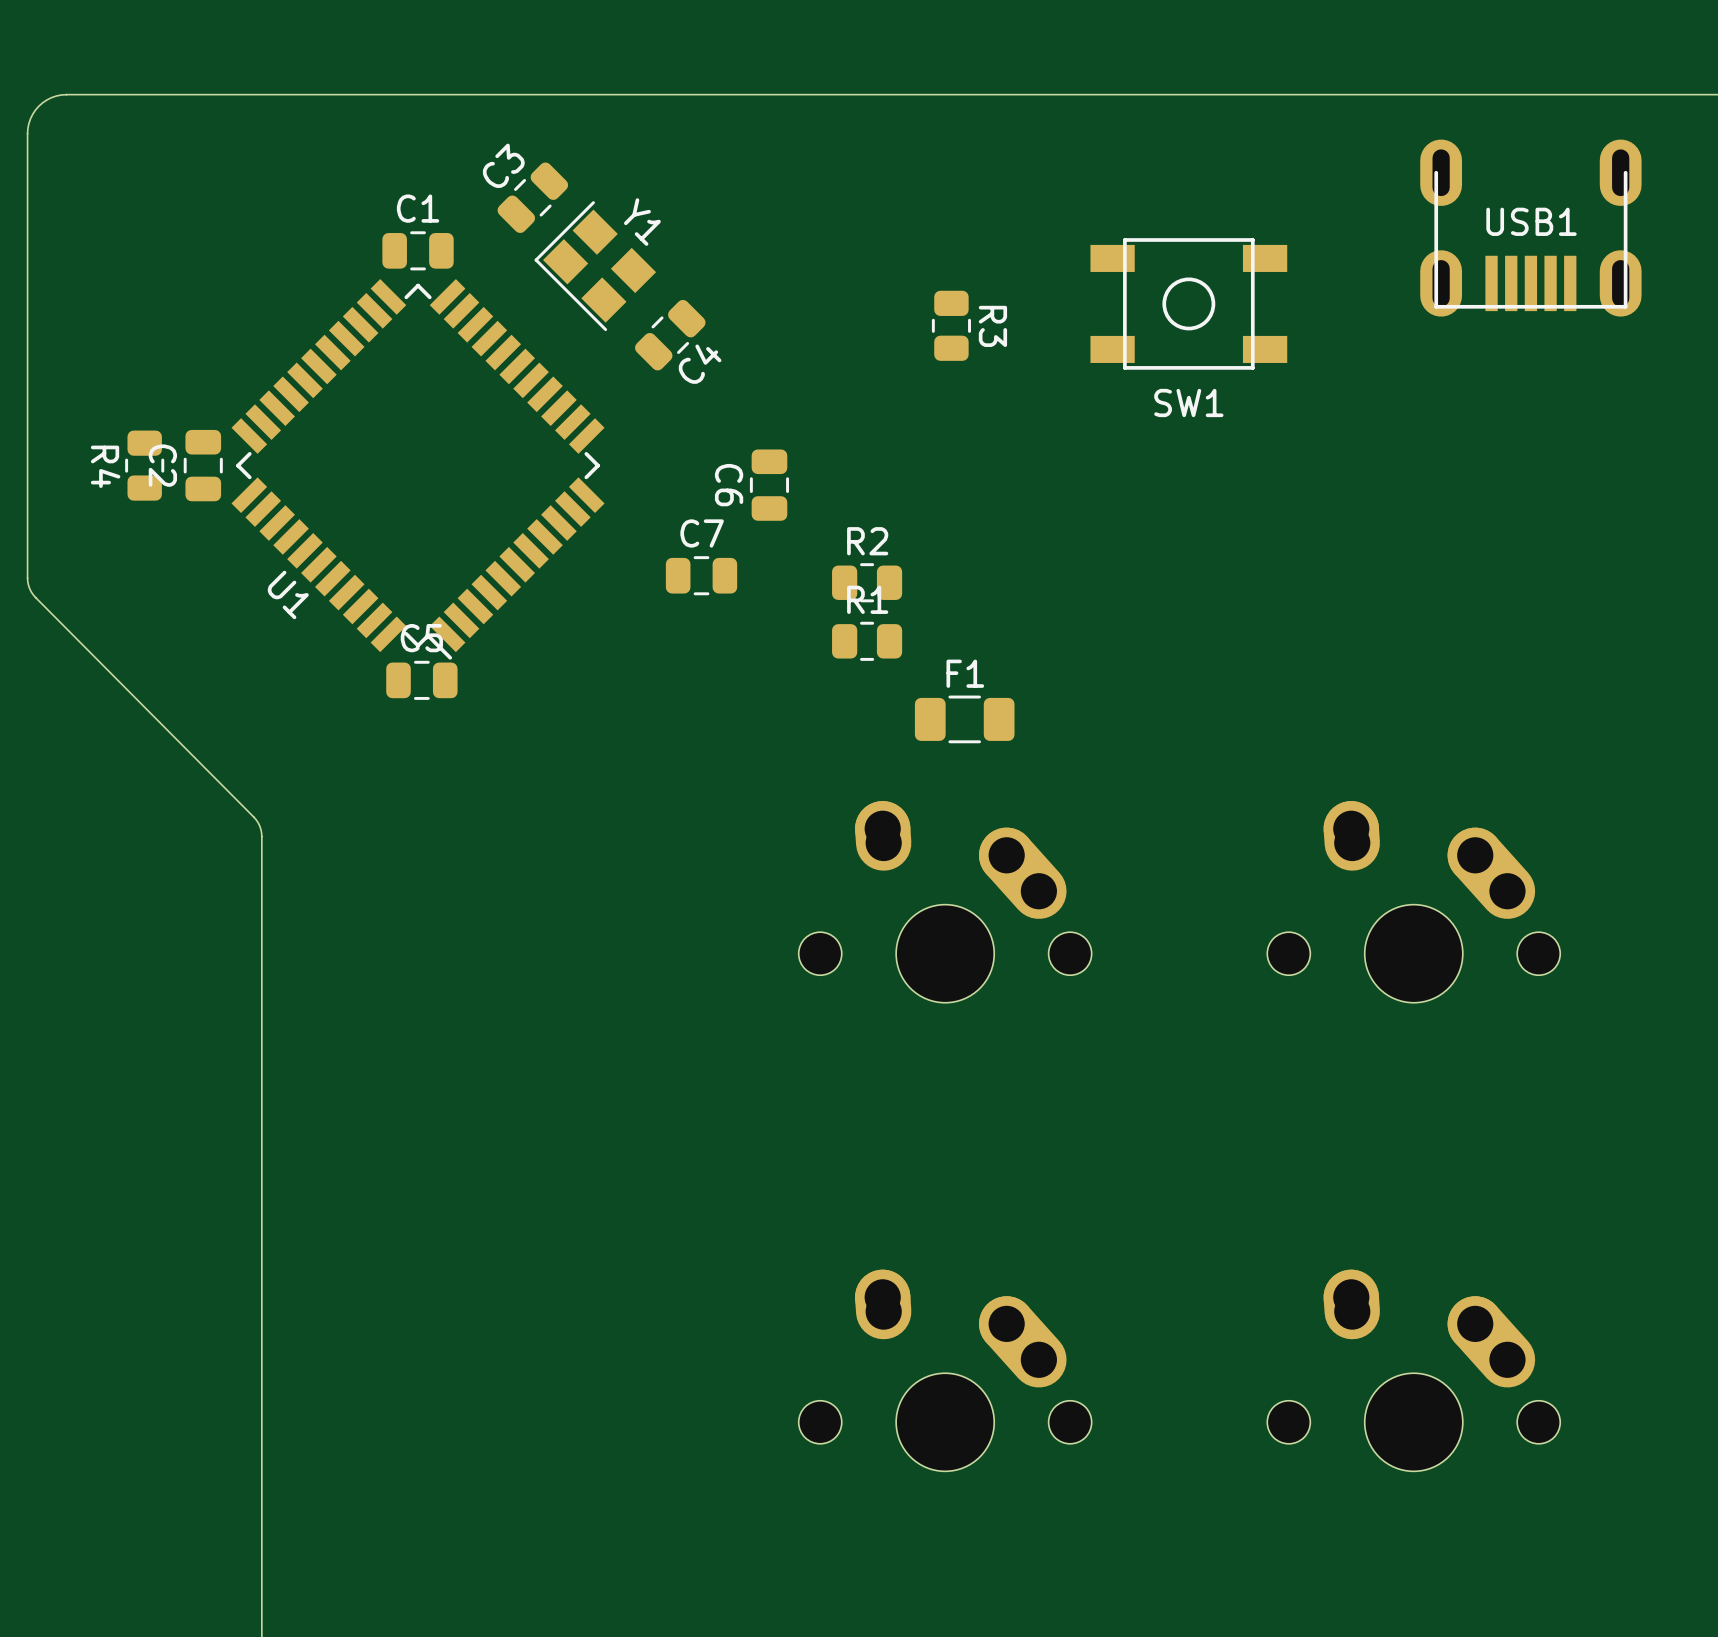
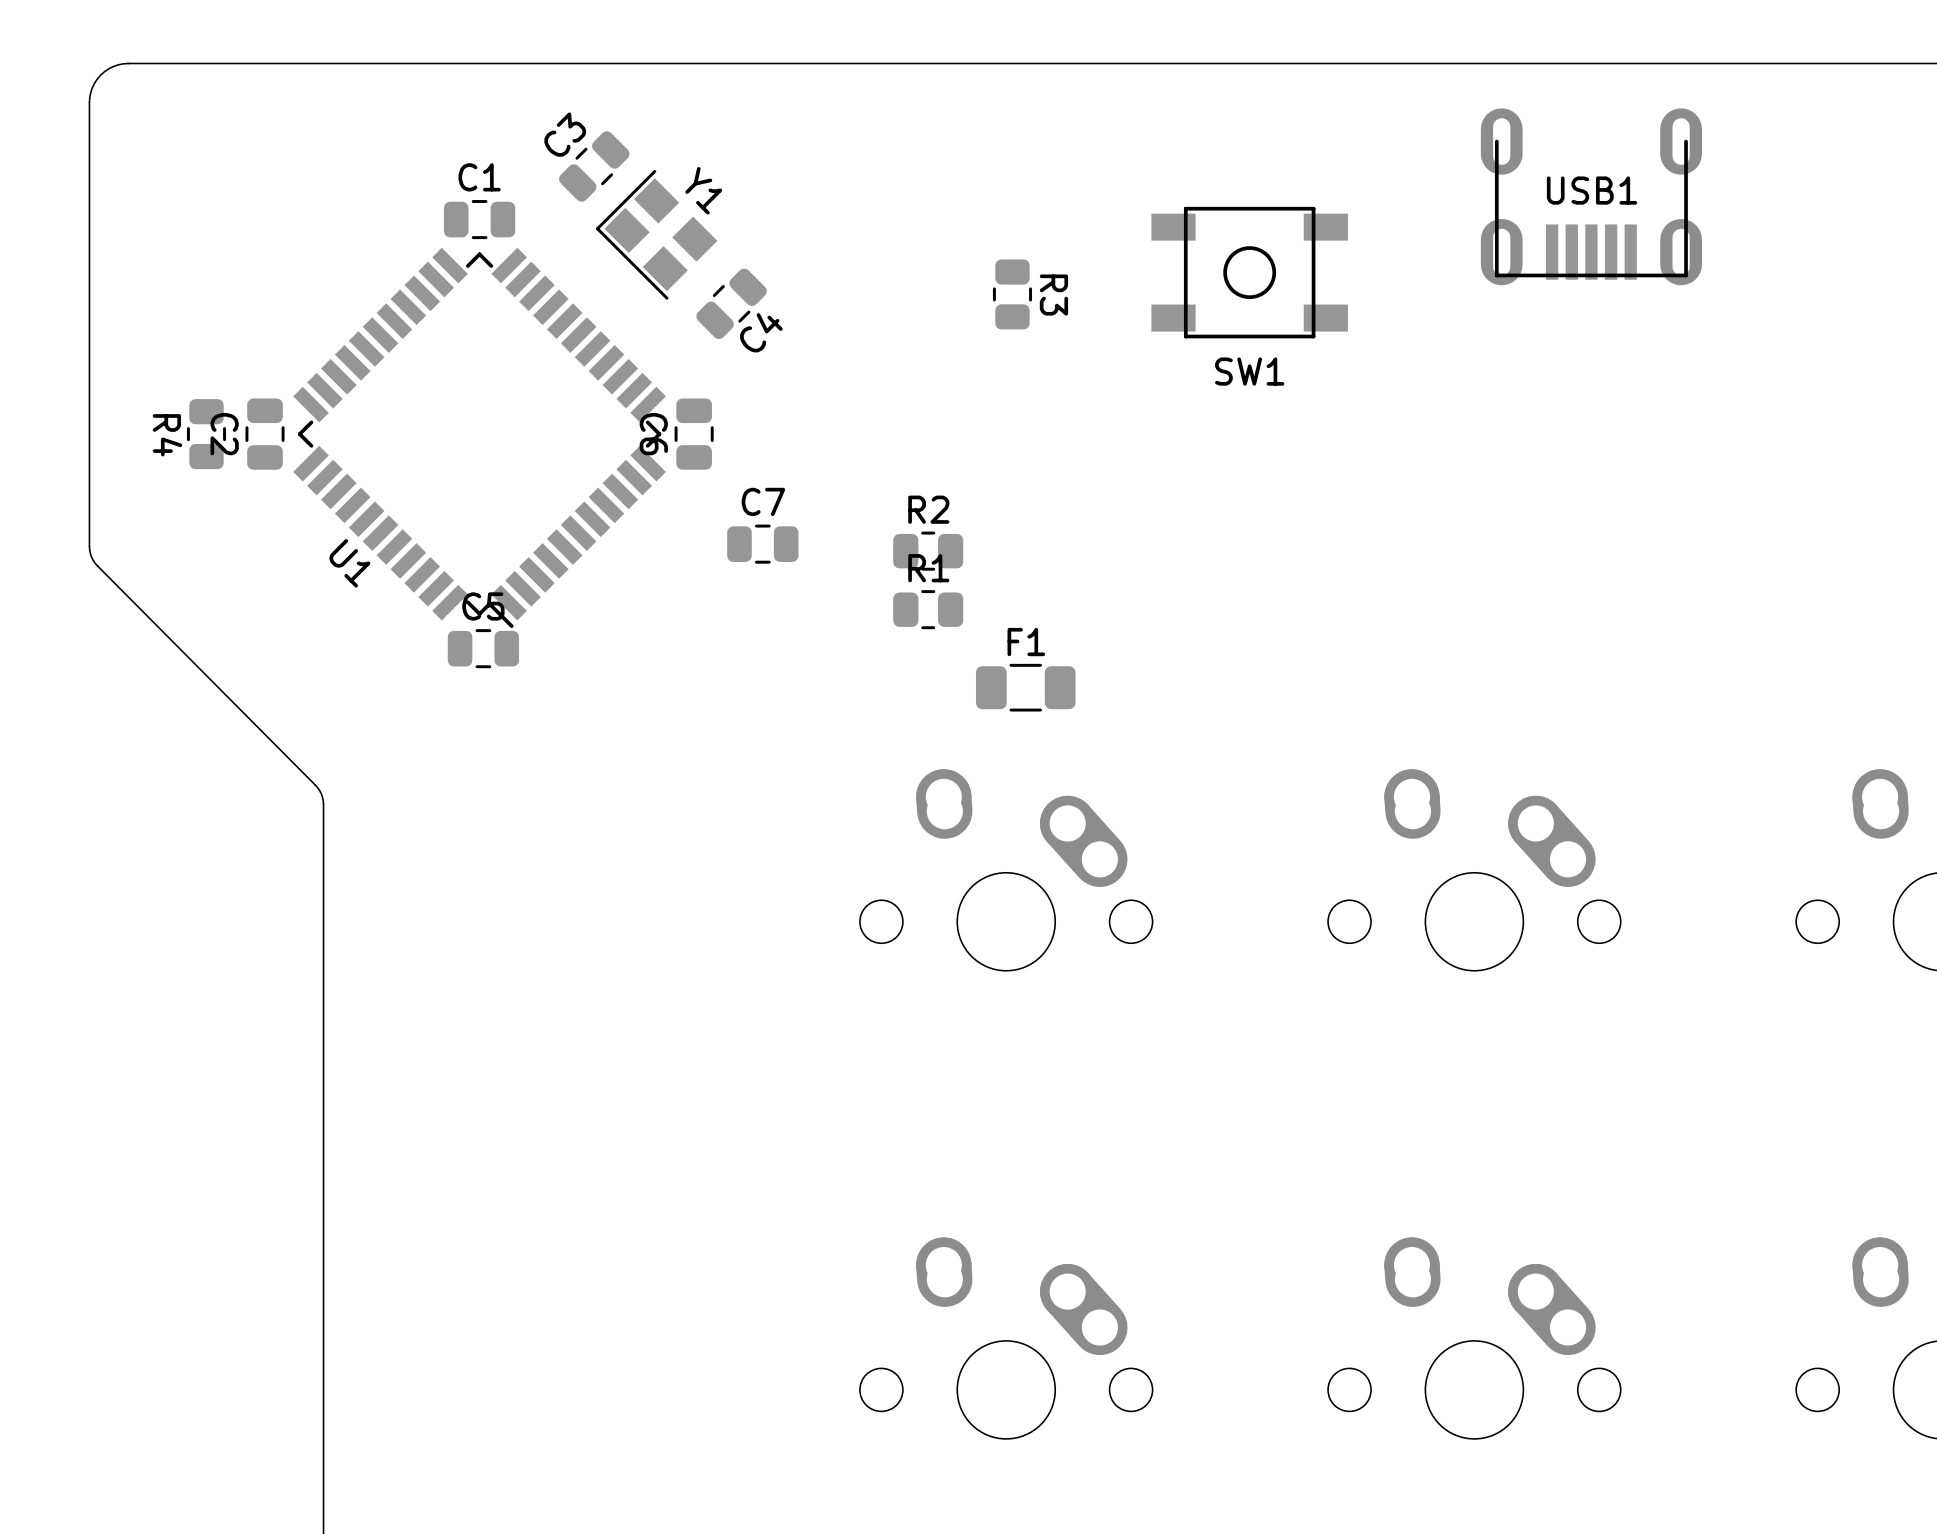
C6 position: (769, 485) -> (694, 434)

